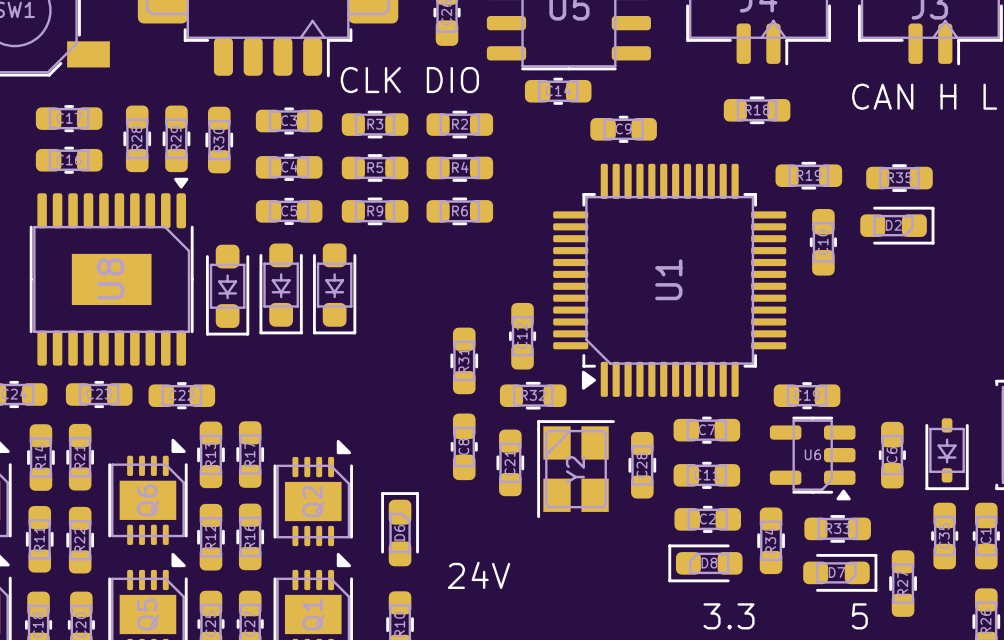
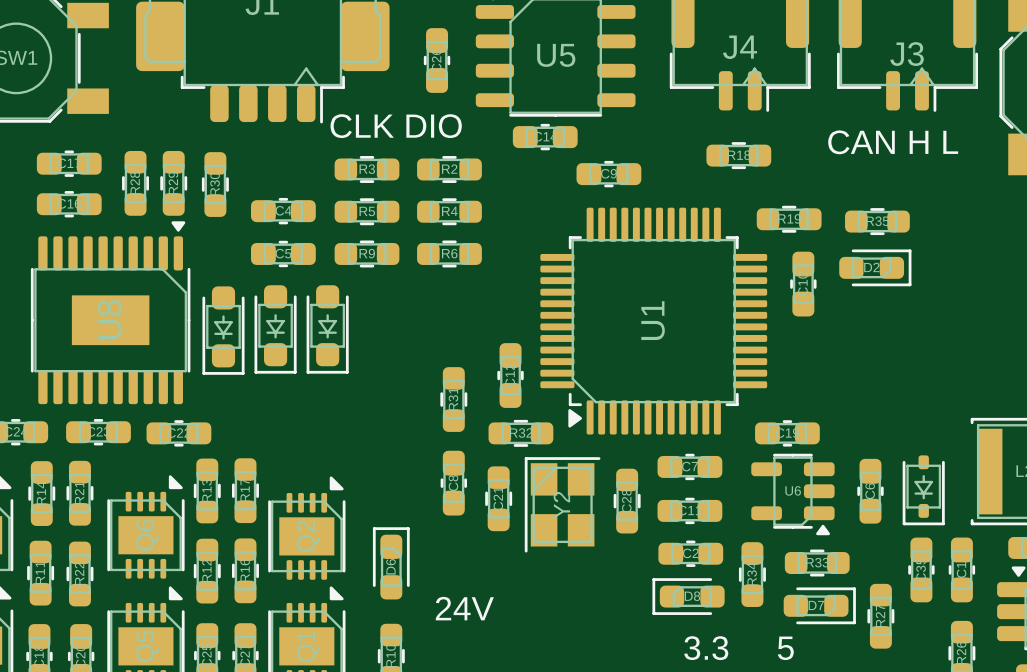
C3: (289, 121) -> none

